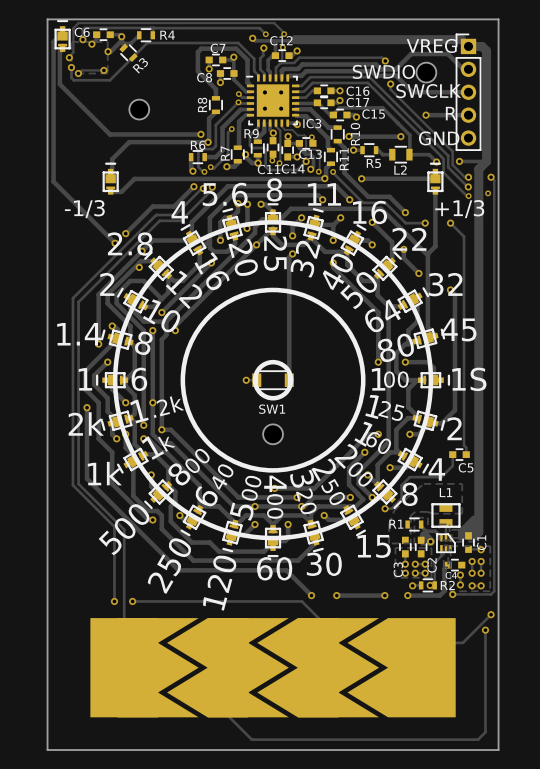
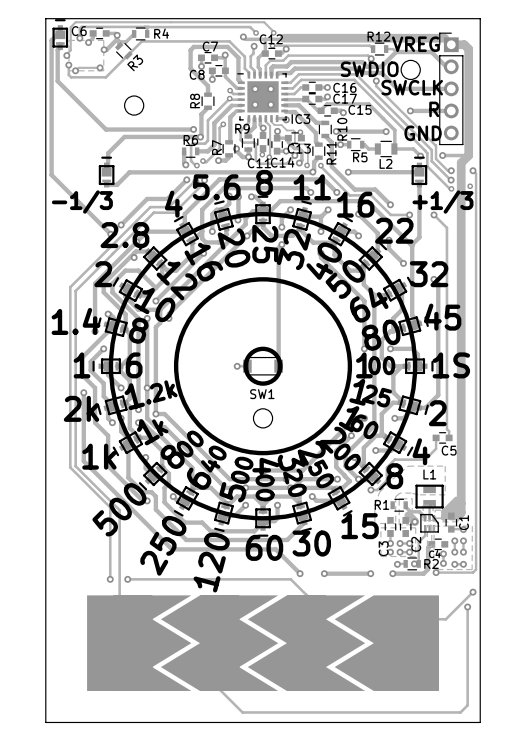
track: (282, 47) (282, 63) -> (272, 45) (369, 45) (373, 49)
R12: none -> (379, 49)
track: none -> (386, 49) (393, 49) (396, 52)

